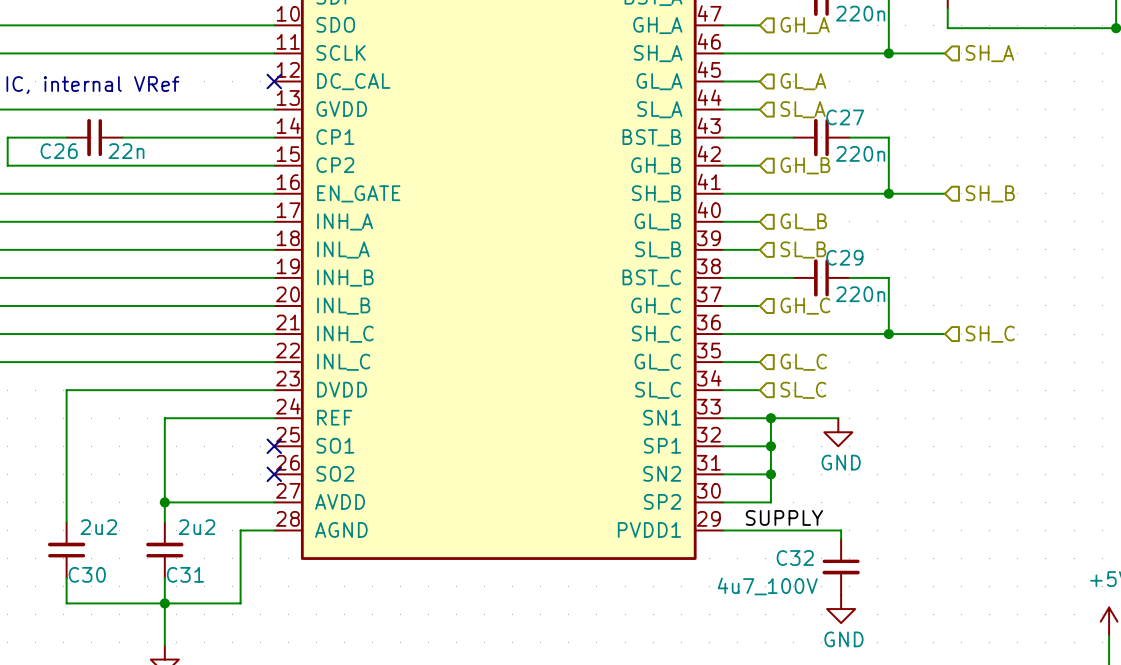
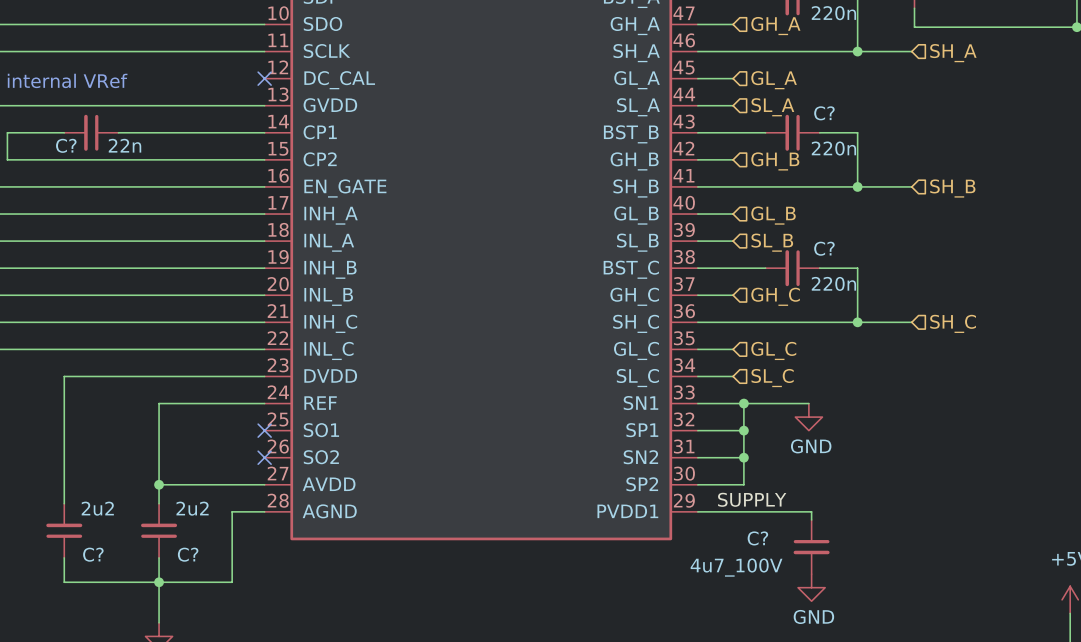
C27 name: C27 (845, 117) -> C? (824, 113)
C26 name: C26 (59, 151) -> C? (66, 145)
C29 name: C29 (844, 257) -> C? (824, 248)
C32 name: C32 (795, 558) -> C? (757, 538)
C30 name: C30 (87, 574) -> C? (93, 554)
C31 name: C31 (185, 574) -> C? (188, 554)

